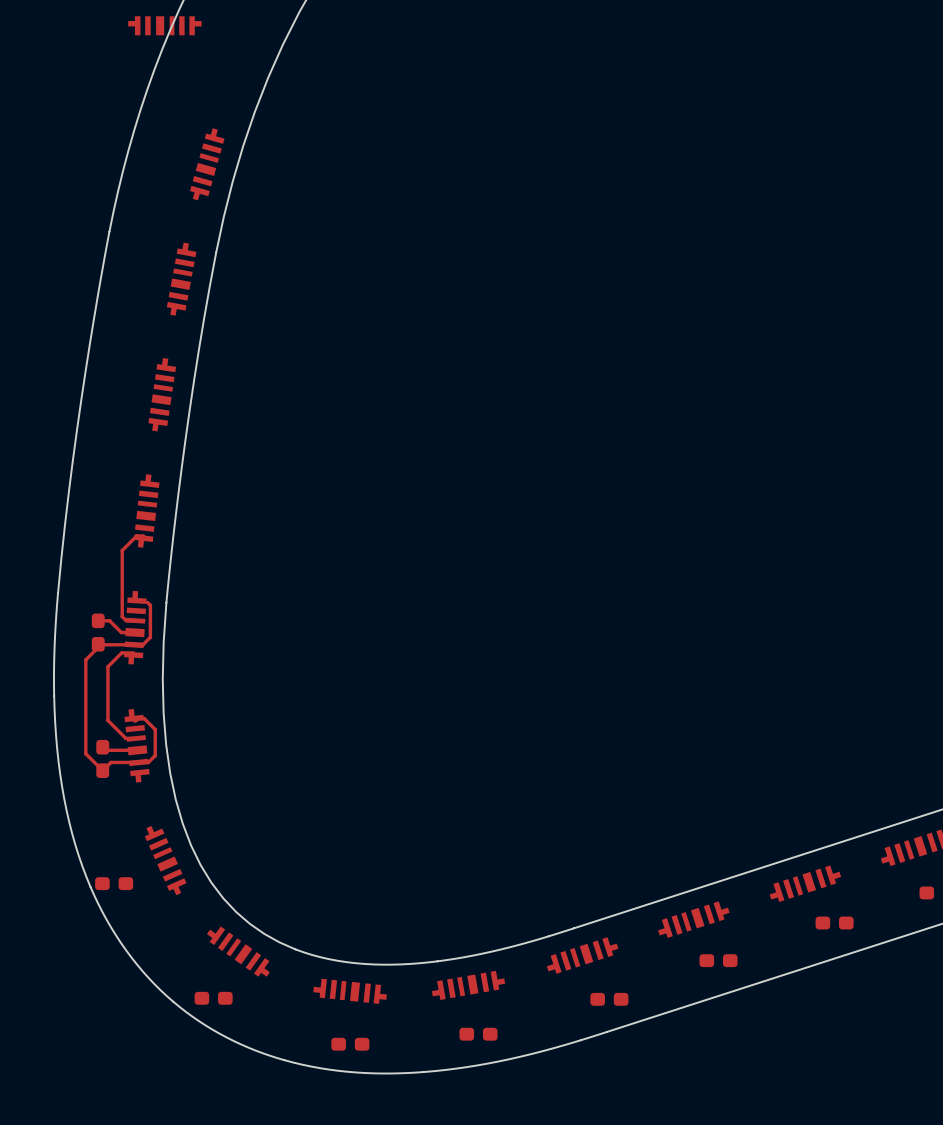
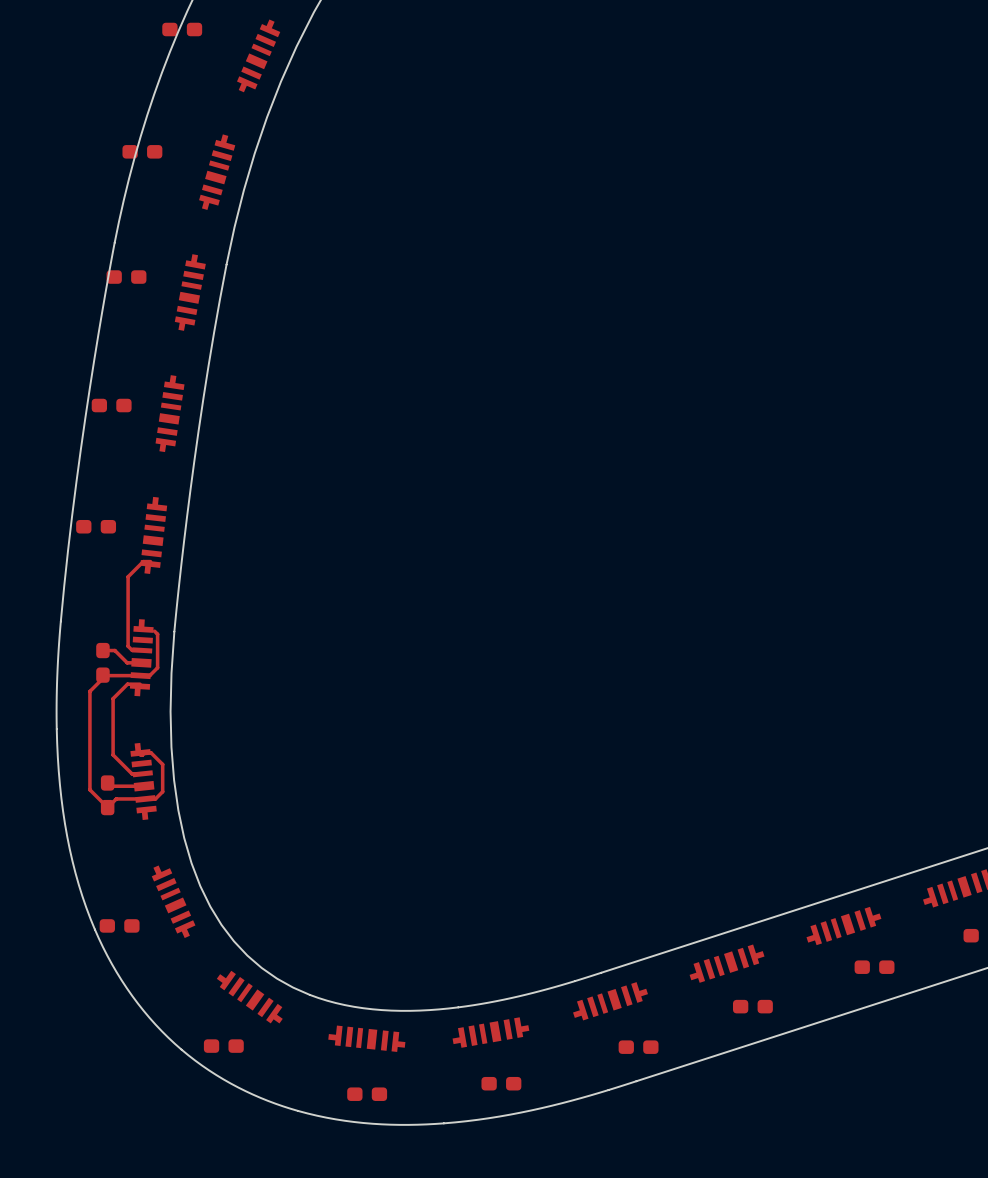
part footprint: [128, 16, 202, 36] -> [162, 22, 203, 37]
part: none -> (258, 55)
part: none -> (142, 151)
part: none -> (126, 277)
part: none -> (111, 405)
part: none -> (96, 526)

